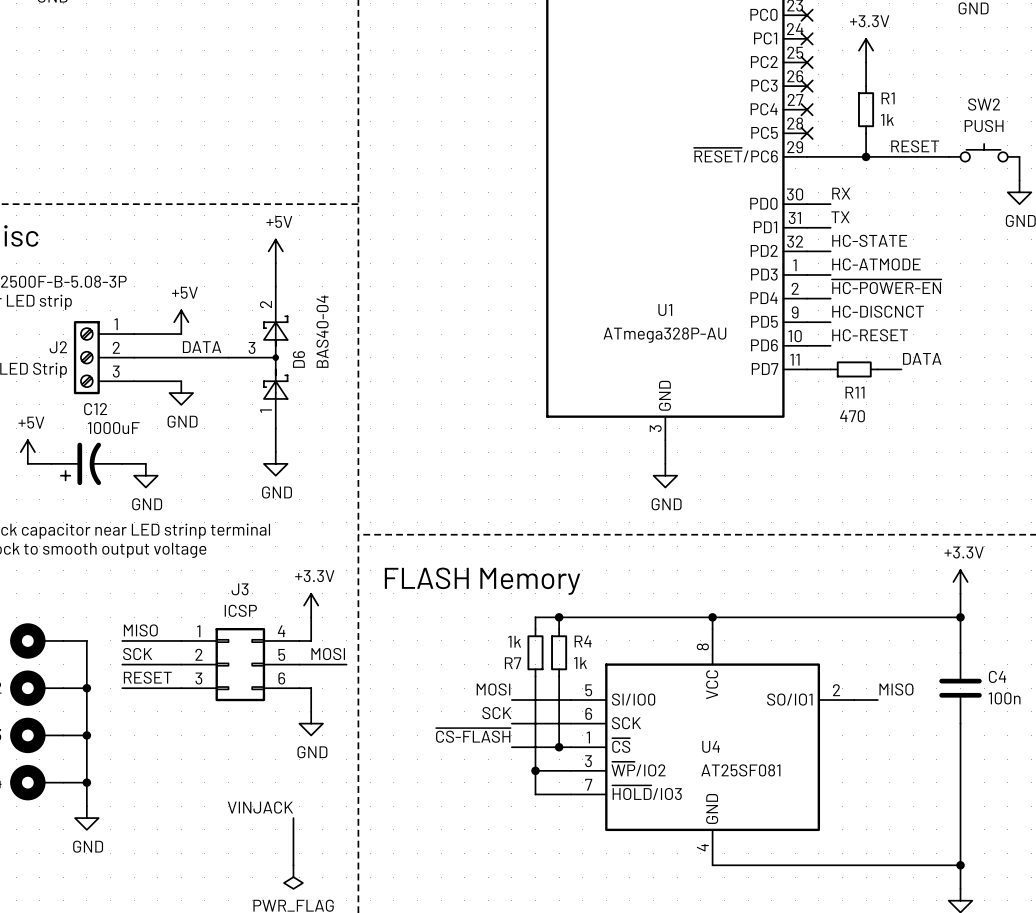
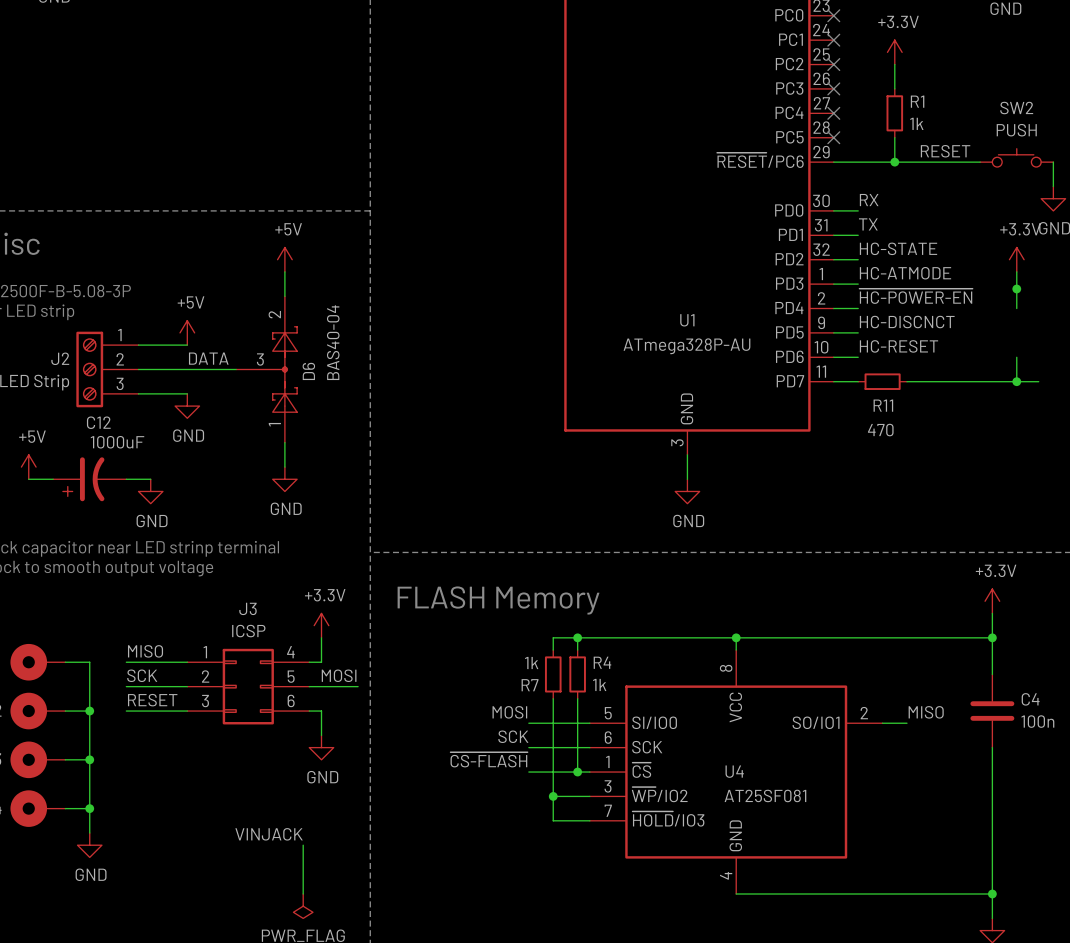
power symbol: none -> +3.3V (1016, 259)
wire: none -> (1016, 271) (1016, 308)
junction: none -> (1016, 288)
wire: none -> (1016, 357) (1016, 381)
label: DATA (922, 358) -> none
wire: none -> (931, 381) (1038, 381)
junction: none -> (1016, 381)

